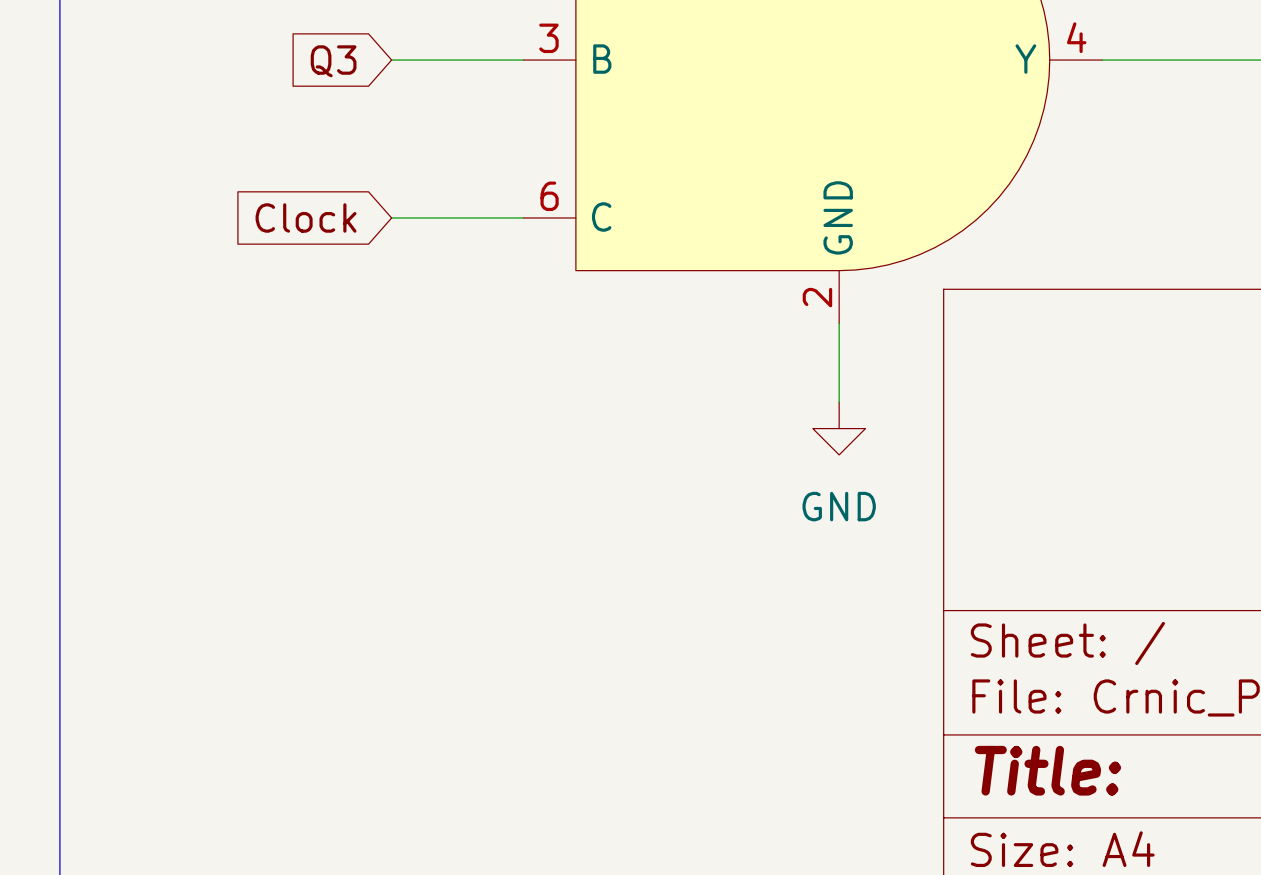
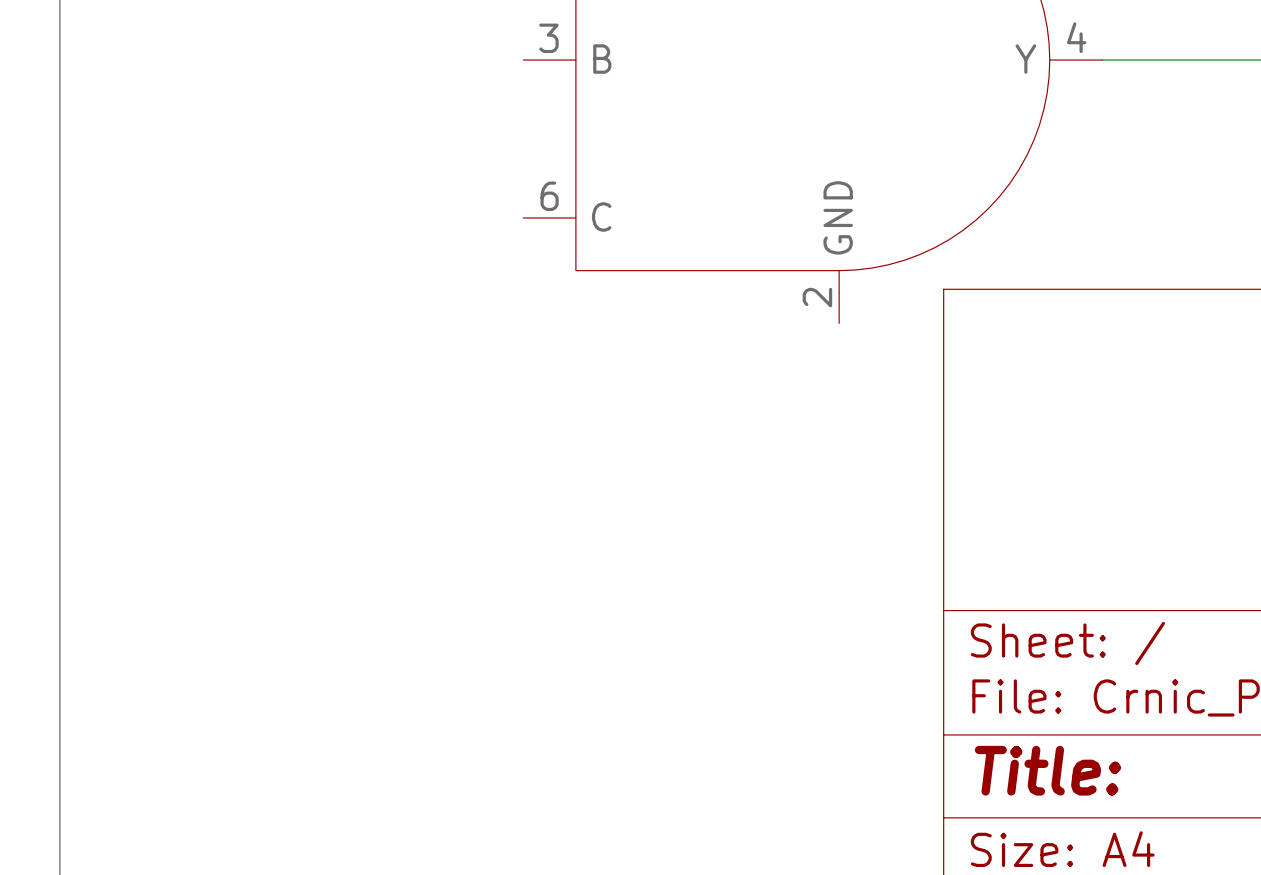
wire: (391, 60) (523, 60) -> none
global label: Q3 (333, 61) -> none
global label: Clock (306, 217) -> none
wire: (391, 217) (523, 217) -> none
wire: (839, 323) (839, 402) -> none
power symbol: GND (839, 428) -> none

